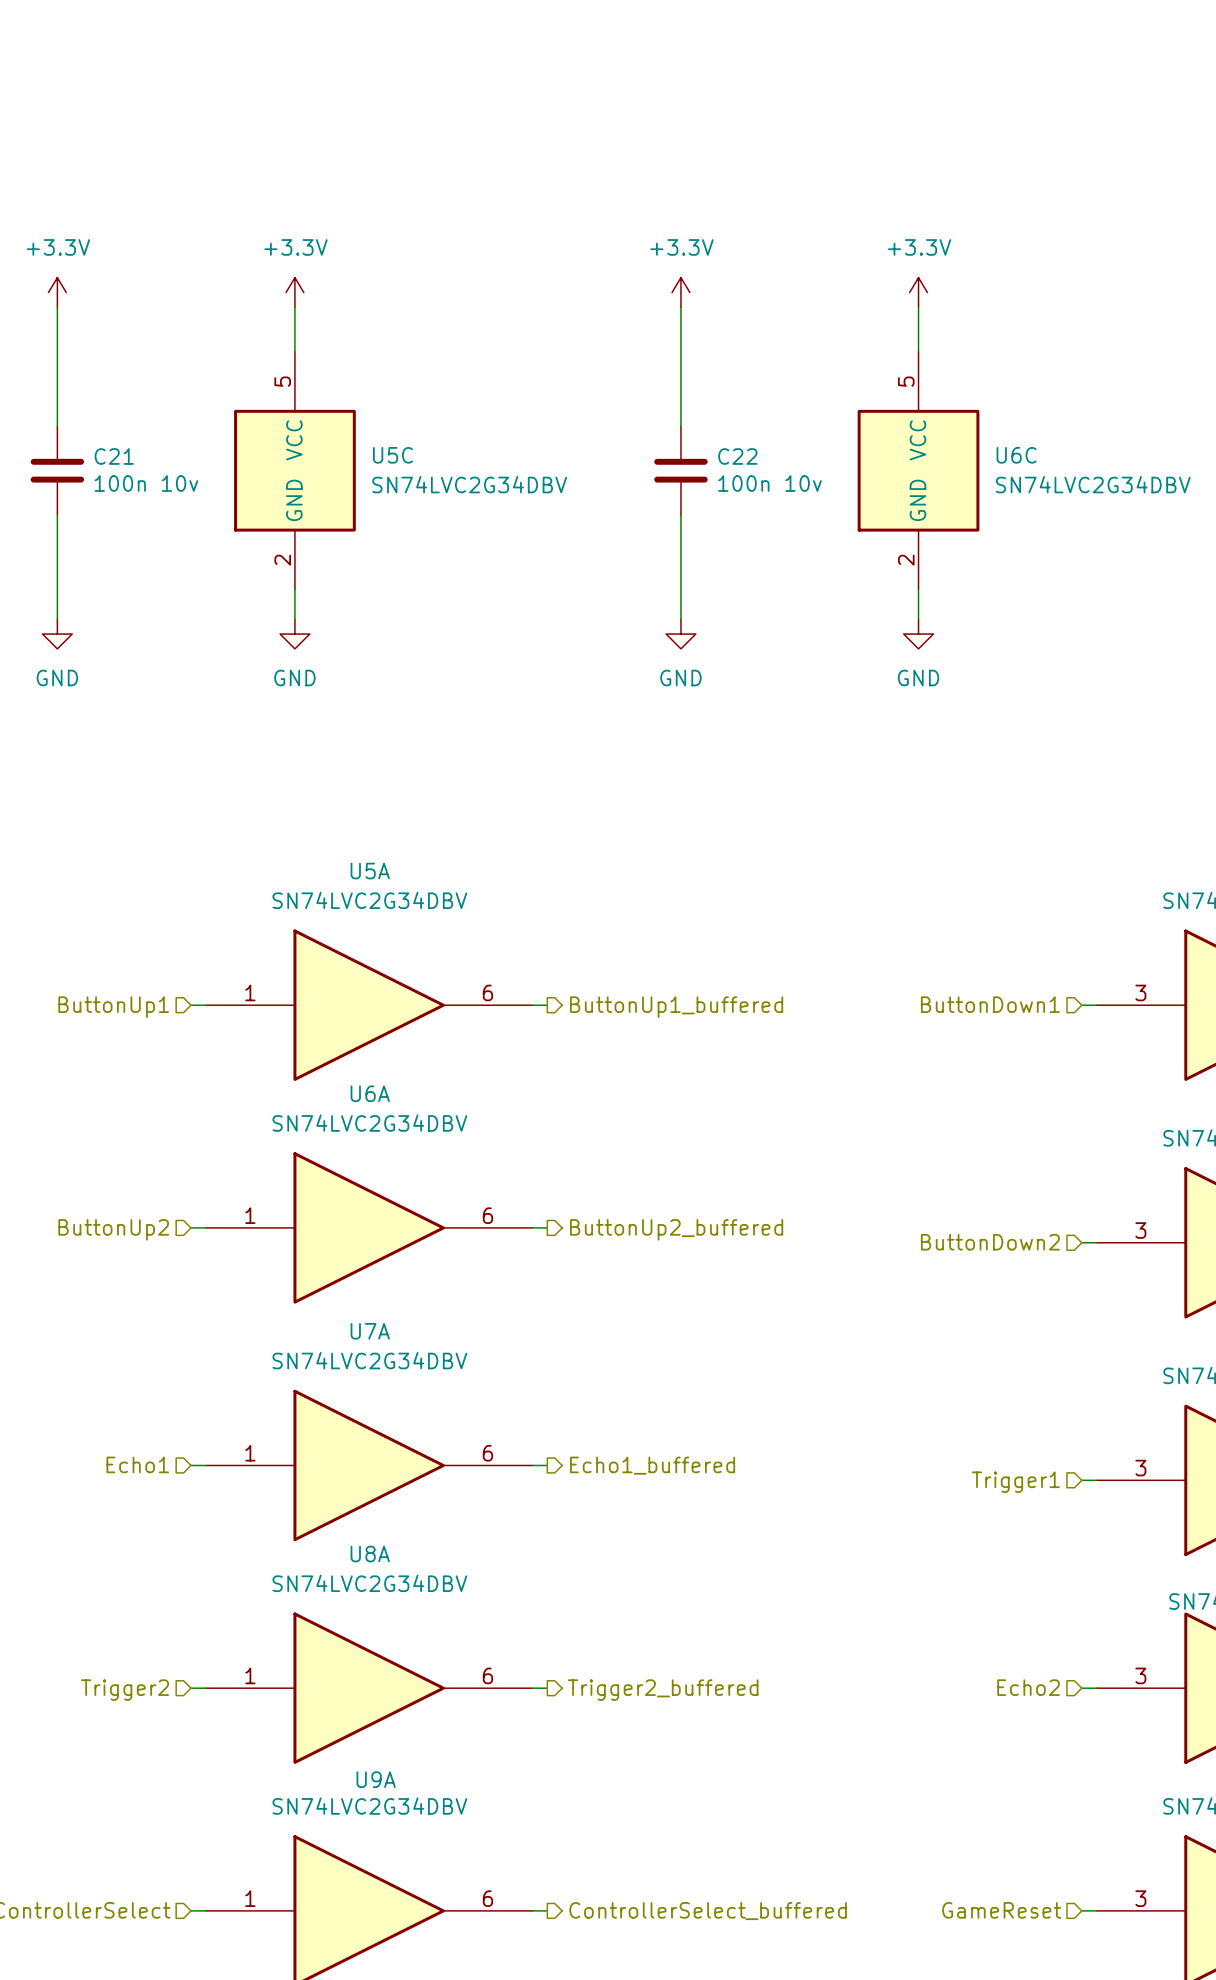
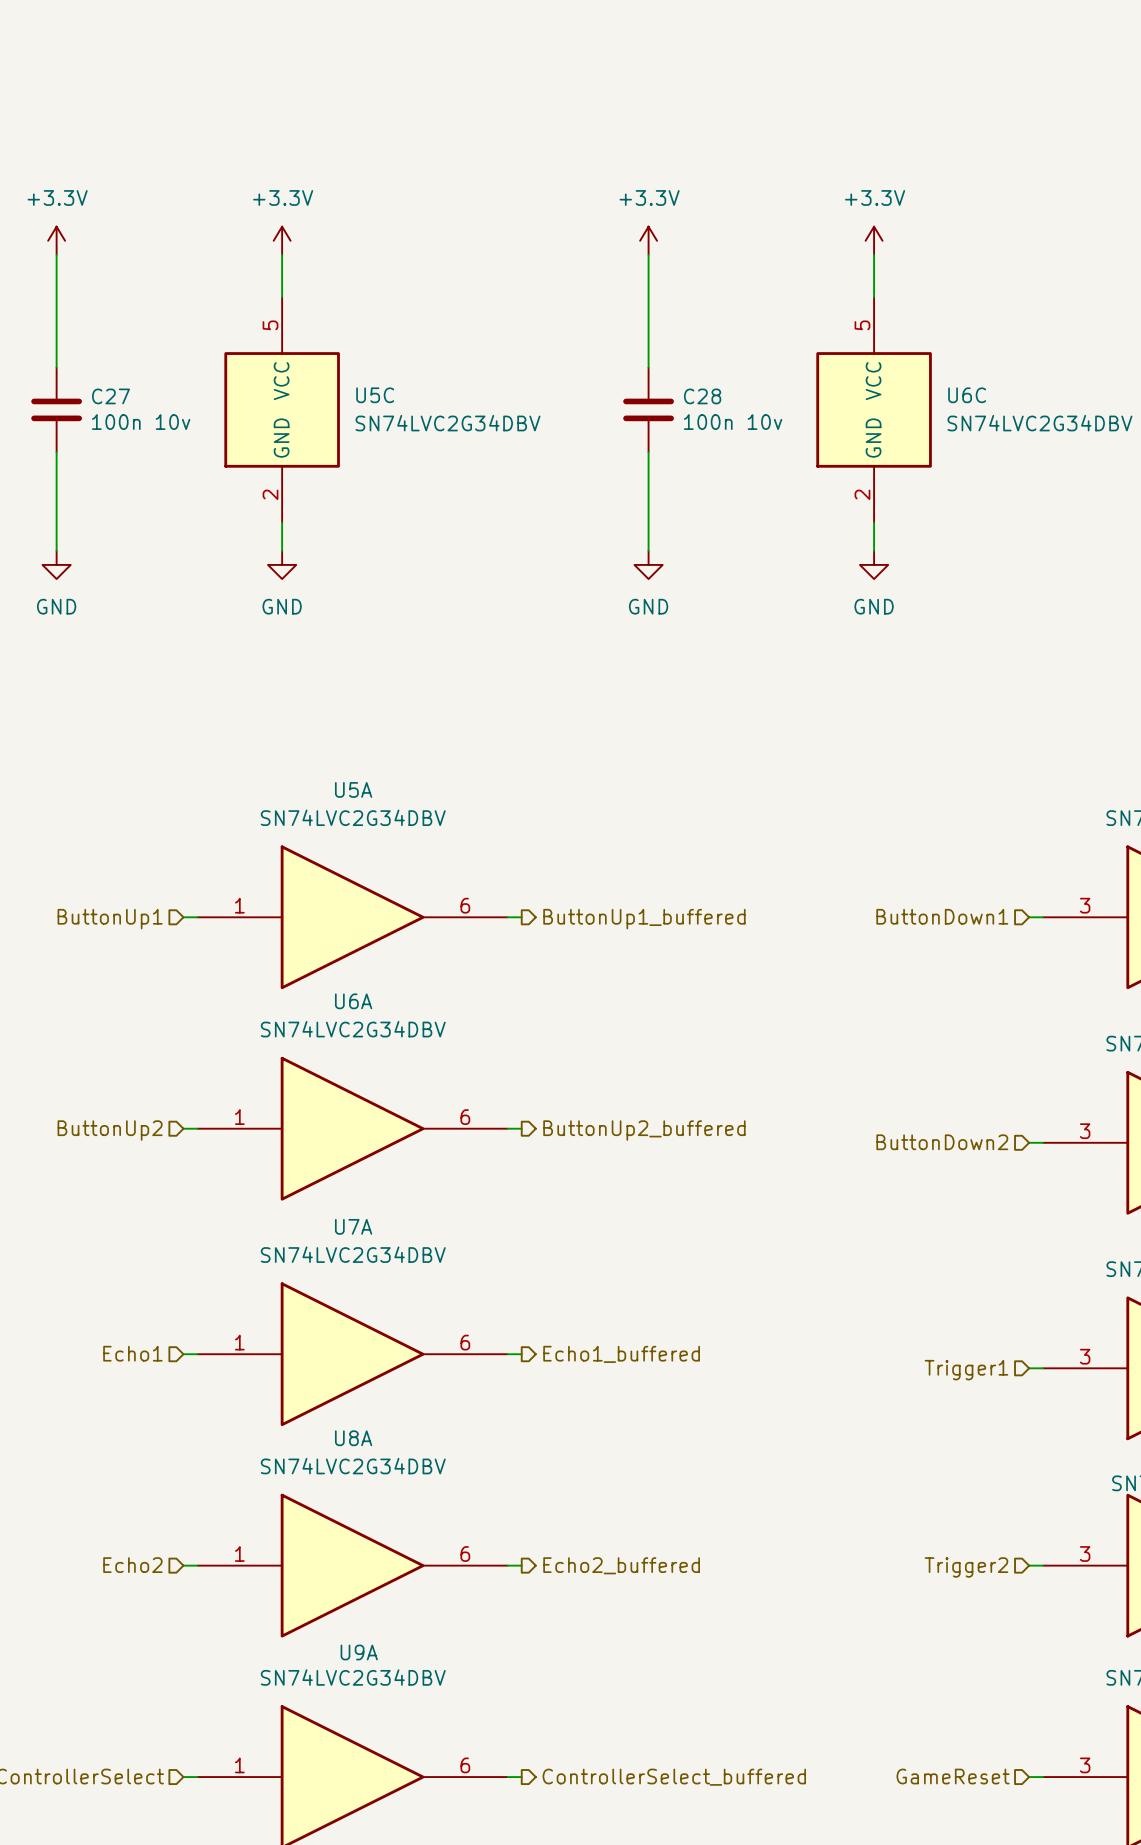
C21 name: C21 (114, 456) -> C27 (110, 396)
C22 name: C22 (737, 456) -> C28 (702, 396)
hierarchical label: Echo2 (1028, 1687) -> Trigger2 (966, 1567)
hierarchical label: Trigger2 (125, 1690) -> Echo2 (132, 1565)
hierarchical label: Trigger2_buffered (663, 1690) -> Echo2_buffered (621, 1565)

